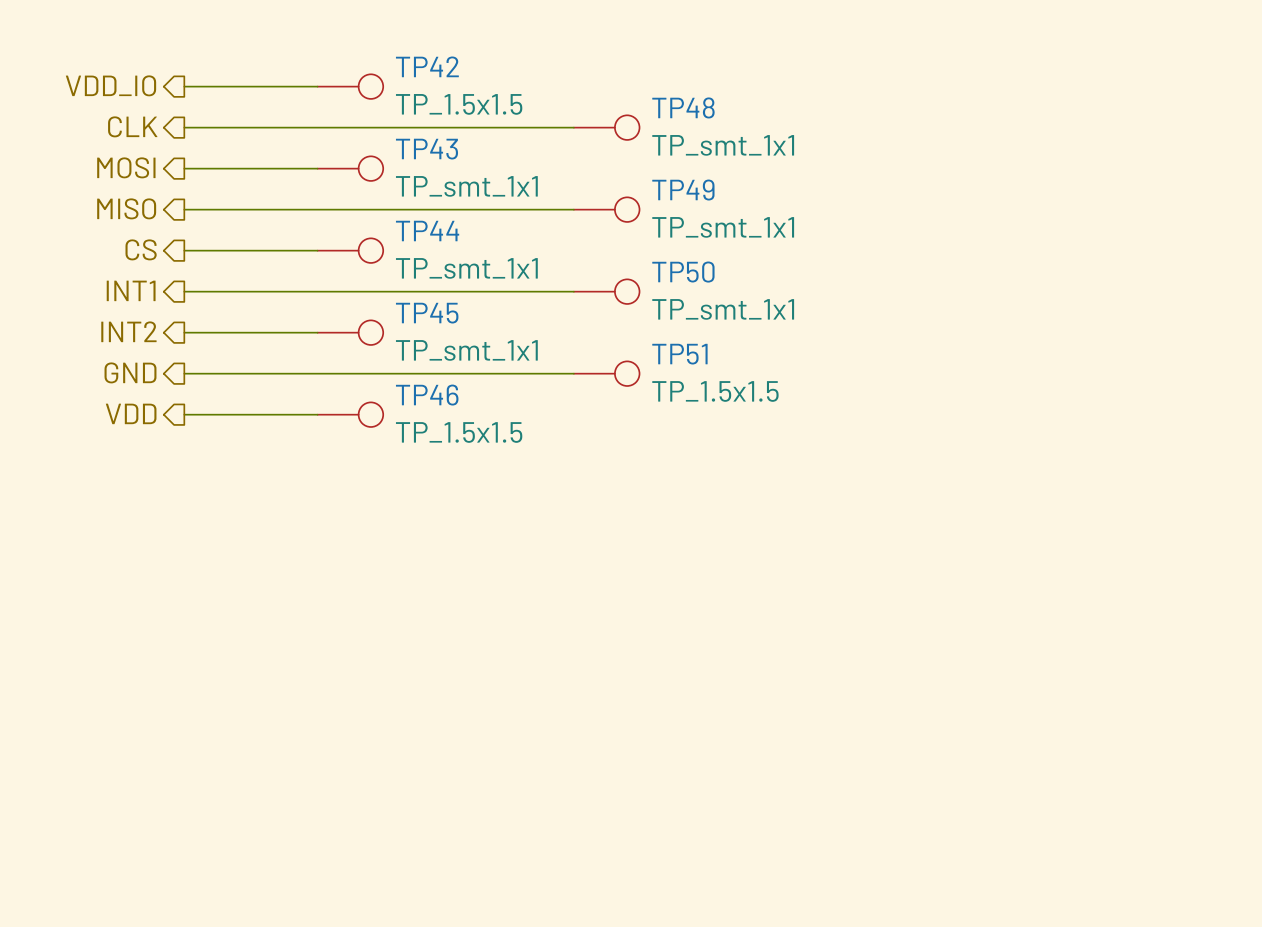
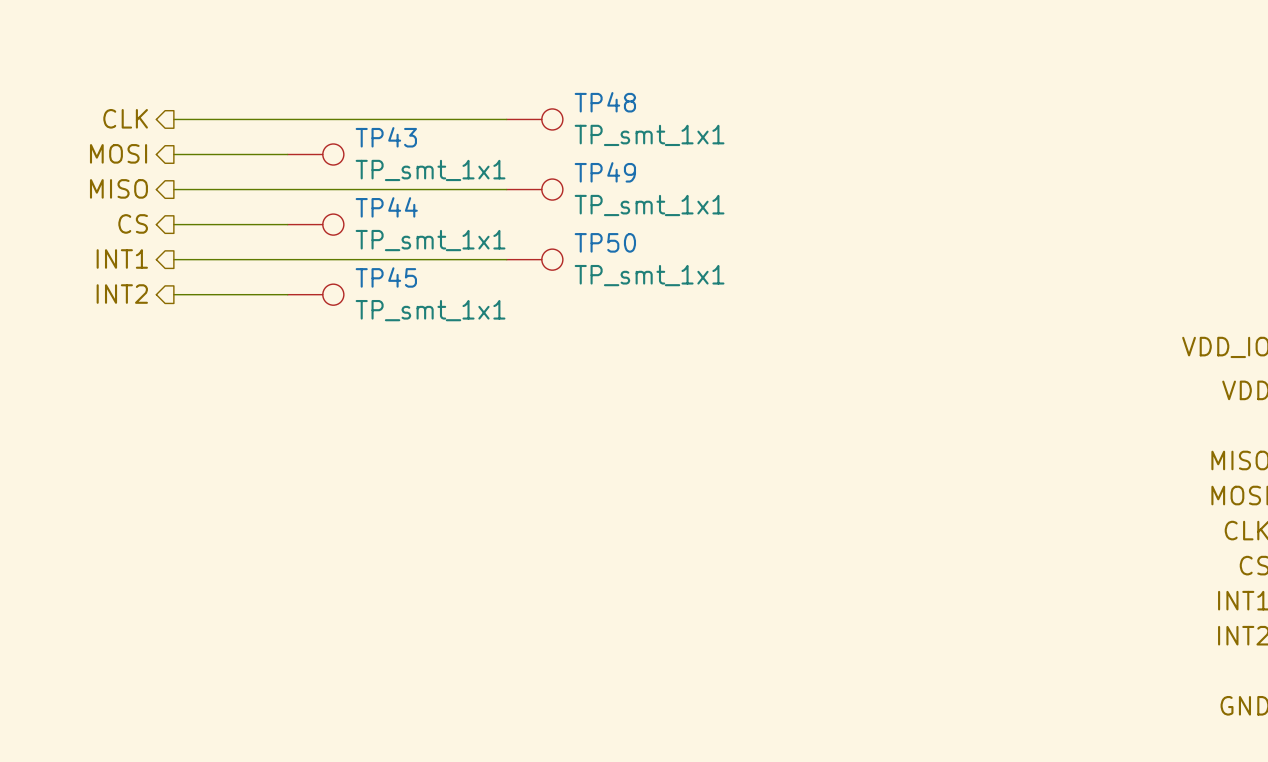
hierarchical label: VDD_IO (111, 85) -> none
wire: (184, 86) (317, 86) -> none
TP42: TP_1.5x1.5 (350, 86) -> none
hierarchical label: GND (130, 372) -> none
wire: (184, 373) (573, 373) -> none
TP51: TP_1.5x1.5 (606, 373) -> none
hierarchical label: VDD (131, 413) -> none
wire: (184, 414) (317, 414) -> none
TP46: TP_1.5x1.5 (350, 414) -> none

